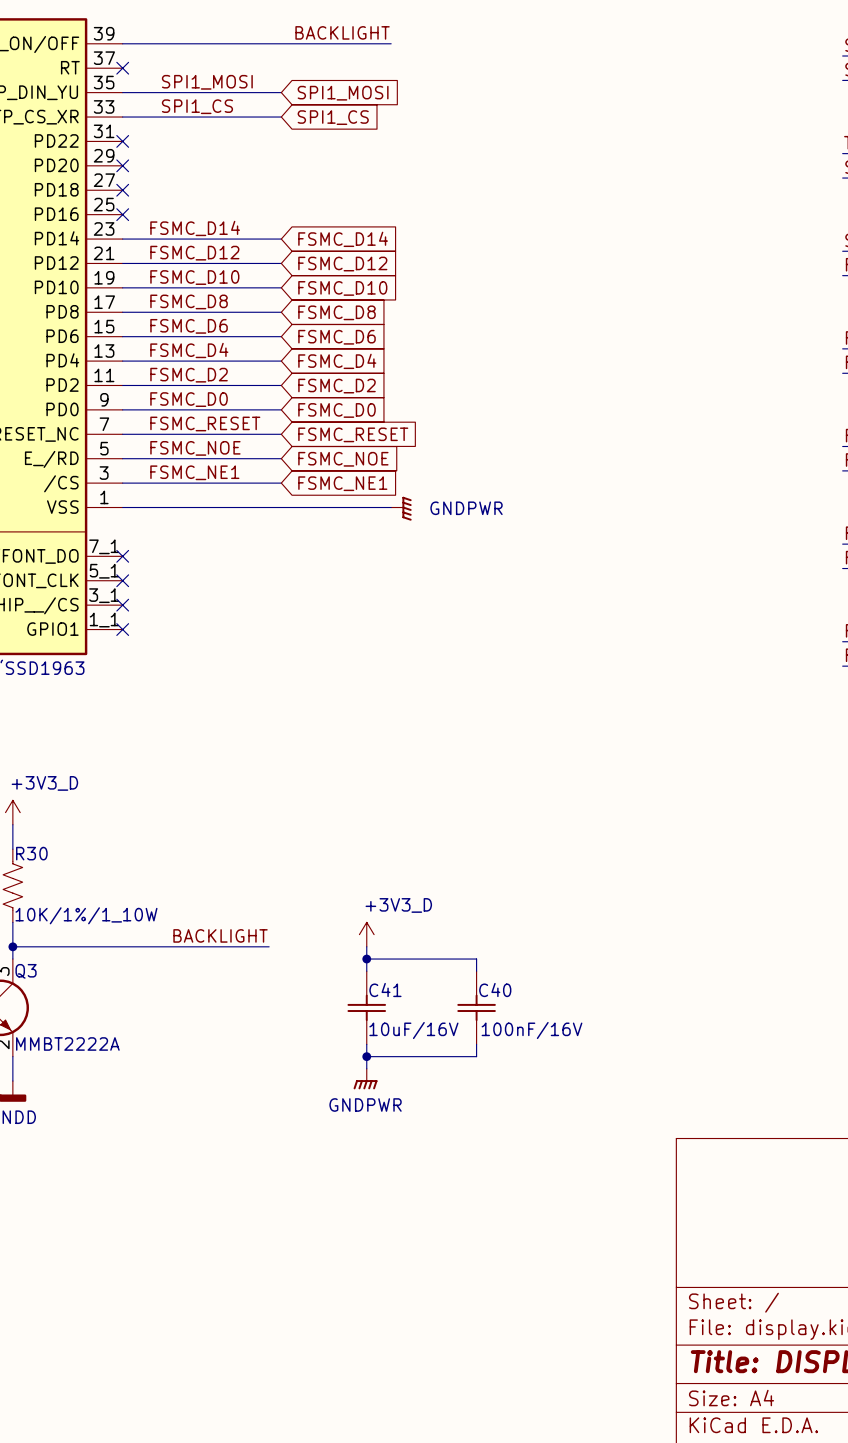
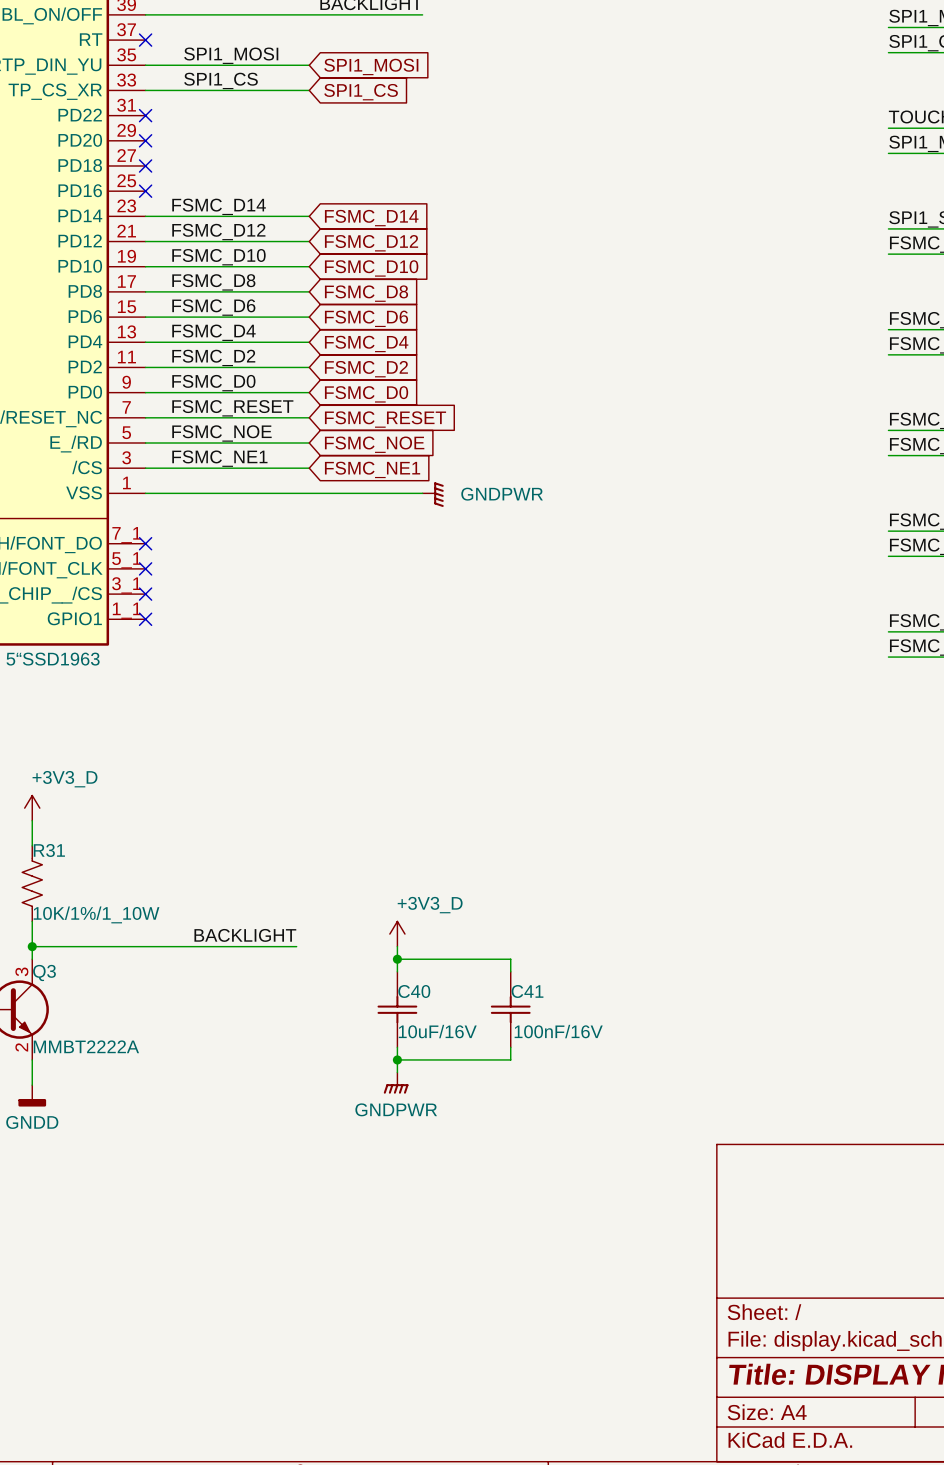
R30 name: R30 (31, 853) -> R31 (49, 850)
C41 name: C41 (385, 990) -> C40 (414, 991)
C40 name: C40 (495, 990) -> C41 (527, 991)

